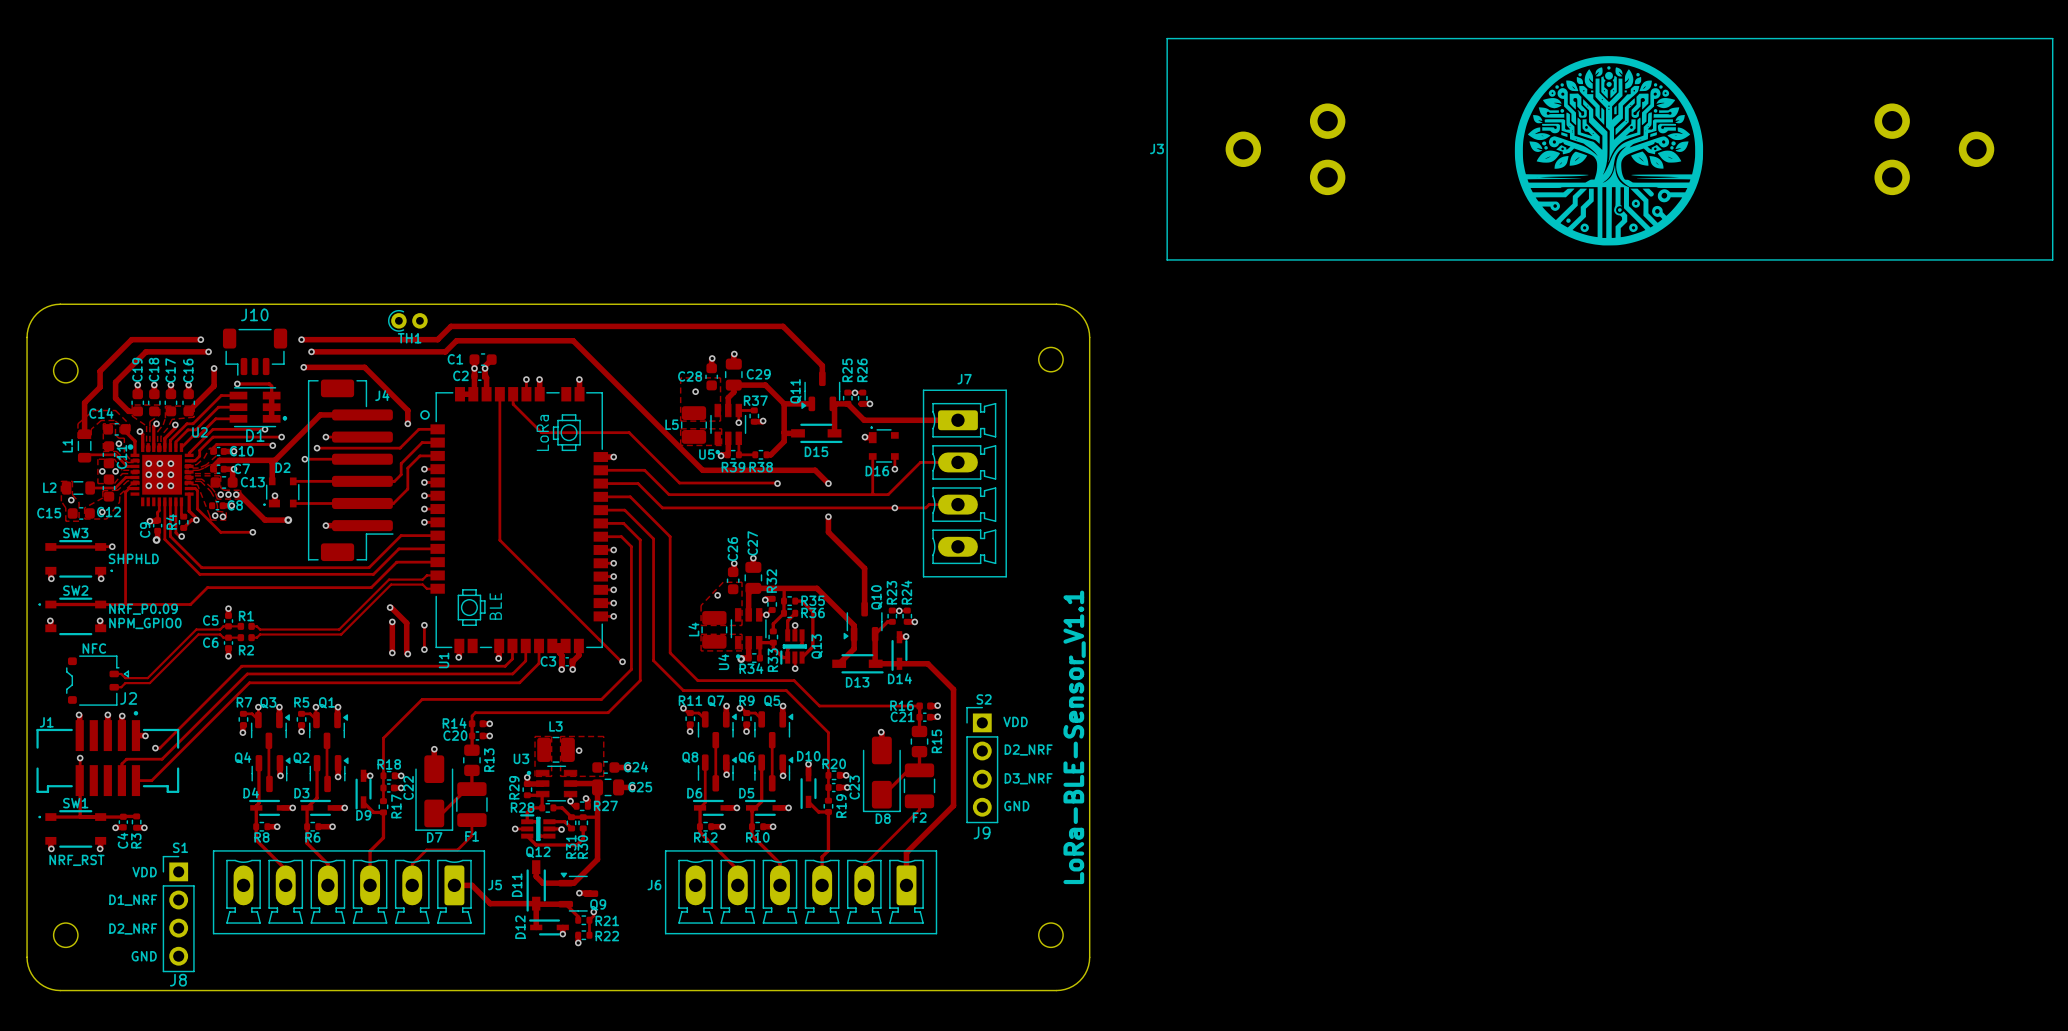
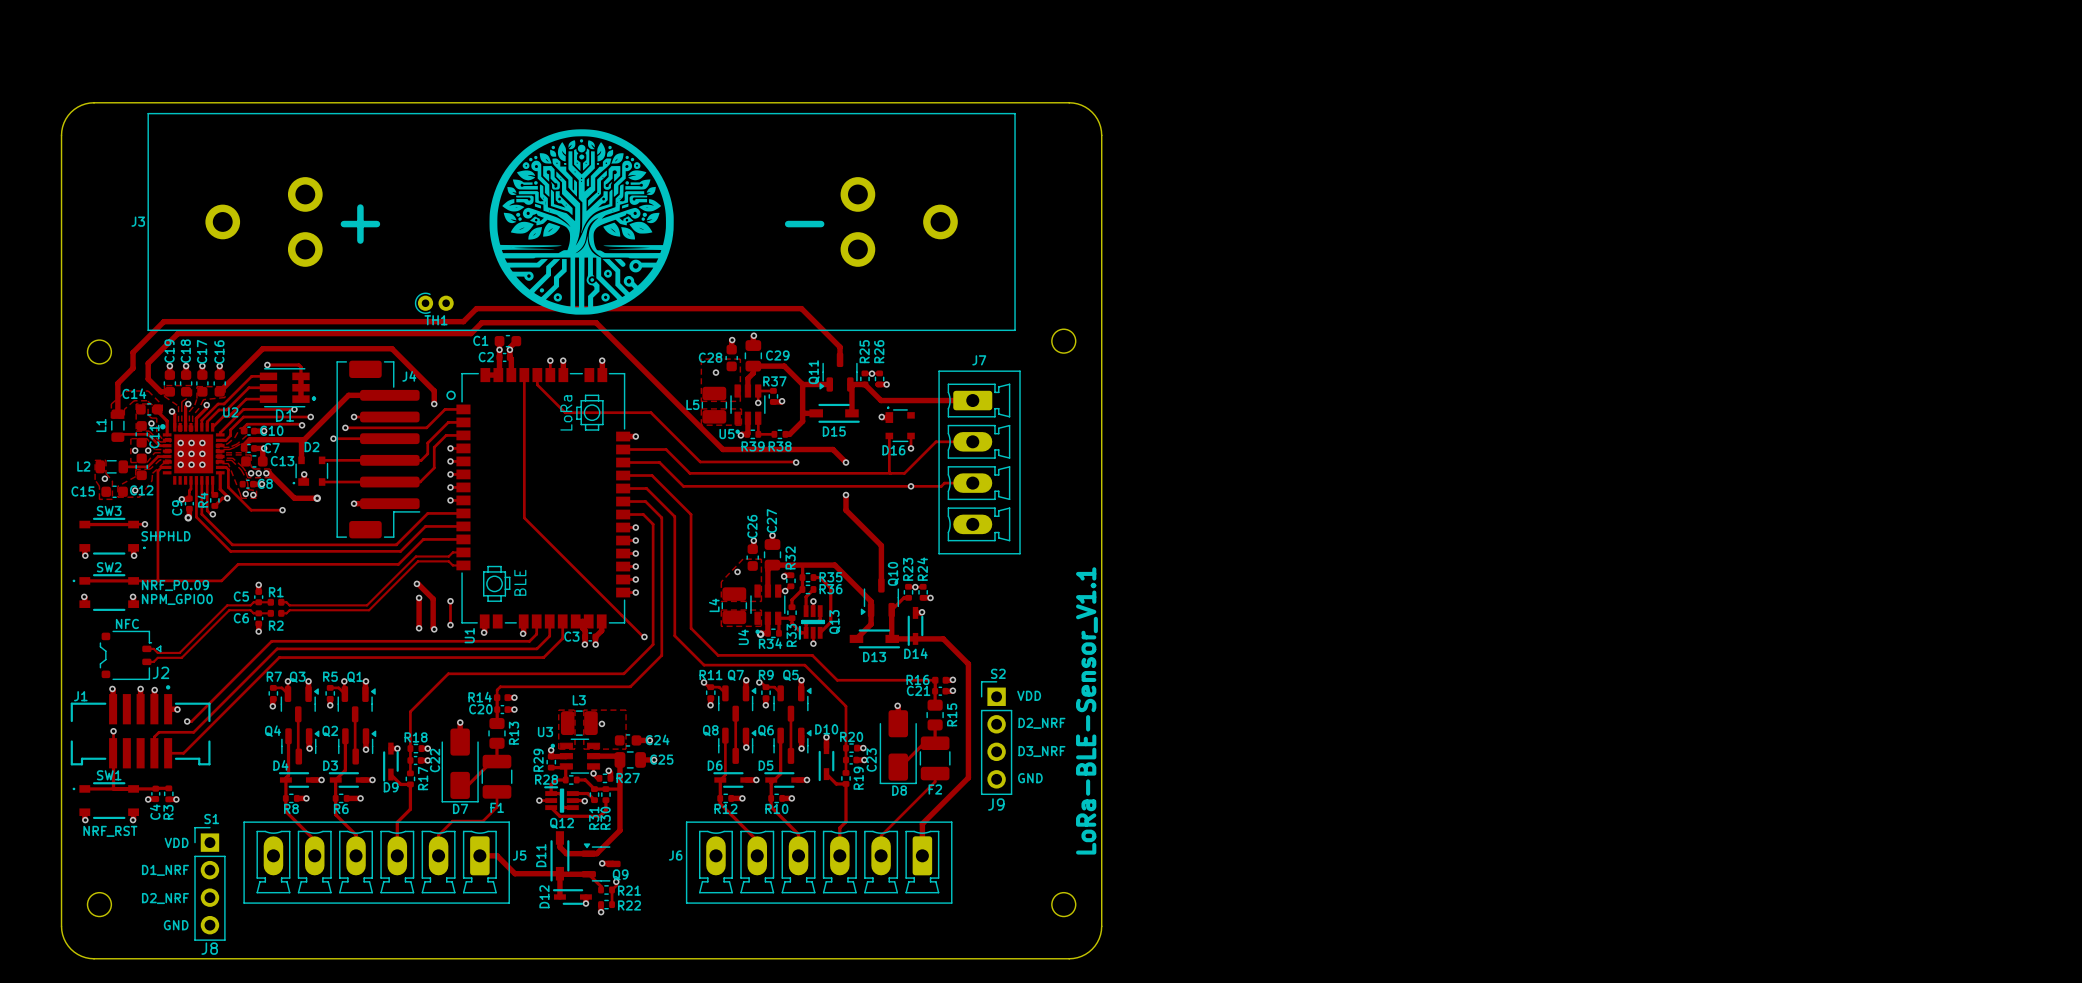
drawing: [1514, 56, 1704, 246] -> none
drawing: none -> [489, 129, 674, 315]
J3 position: (1609, 149) -> (581, 221)
text: none -> + (360, 224)
text: none -> - (804, 224)
board edge: (27, 337) (29, 324) (36, 313) (47, 306) (60, 304) (1056, 304) (1069, 306) (1079, 313) (1087, 324) (1089, 337) -> (61, 319) (61, 131) (65, 119) (71, 112) (81, 105) (94, 102) (1077, 103) (1092, 112) (1099, 122) (1101, 131) (1101, 319)
track: none -> (231, 321) (330, 321)
via: (200, 339) -> none
via: (301, 339) -> none
track: none -> (239, 333) (339, 333)
via: (208, 351) -> none
via: (311, 351) -> none
J10: (255, 352) -> none
via: (303, 367) -> none
track: (214, 368) (214, 385) -> (332, 348) (262, 348) (244, 366)
via: (214, 368) -> none

